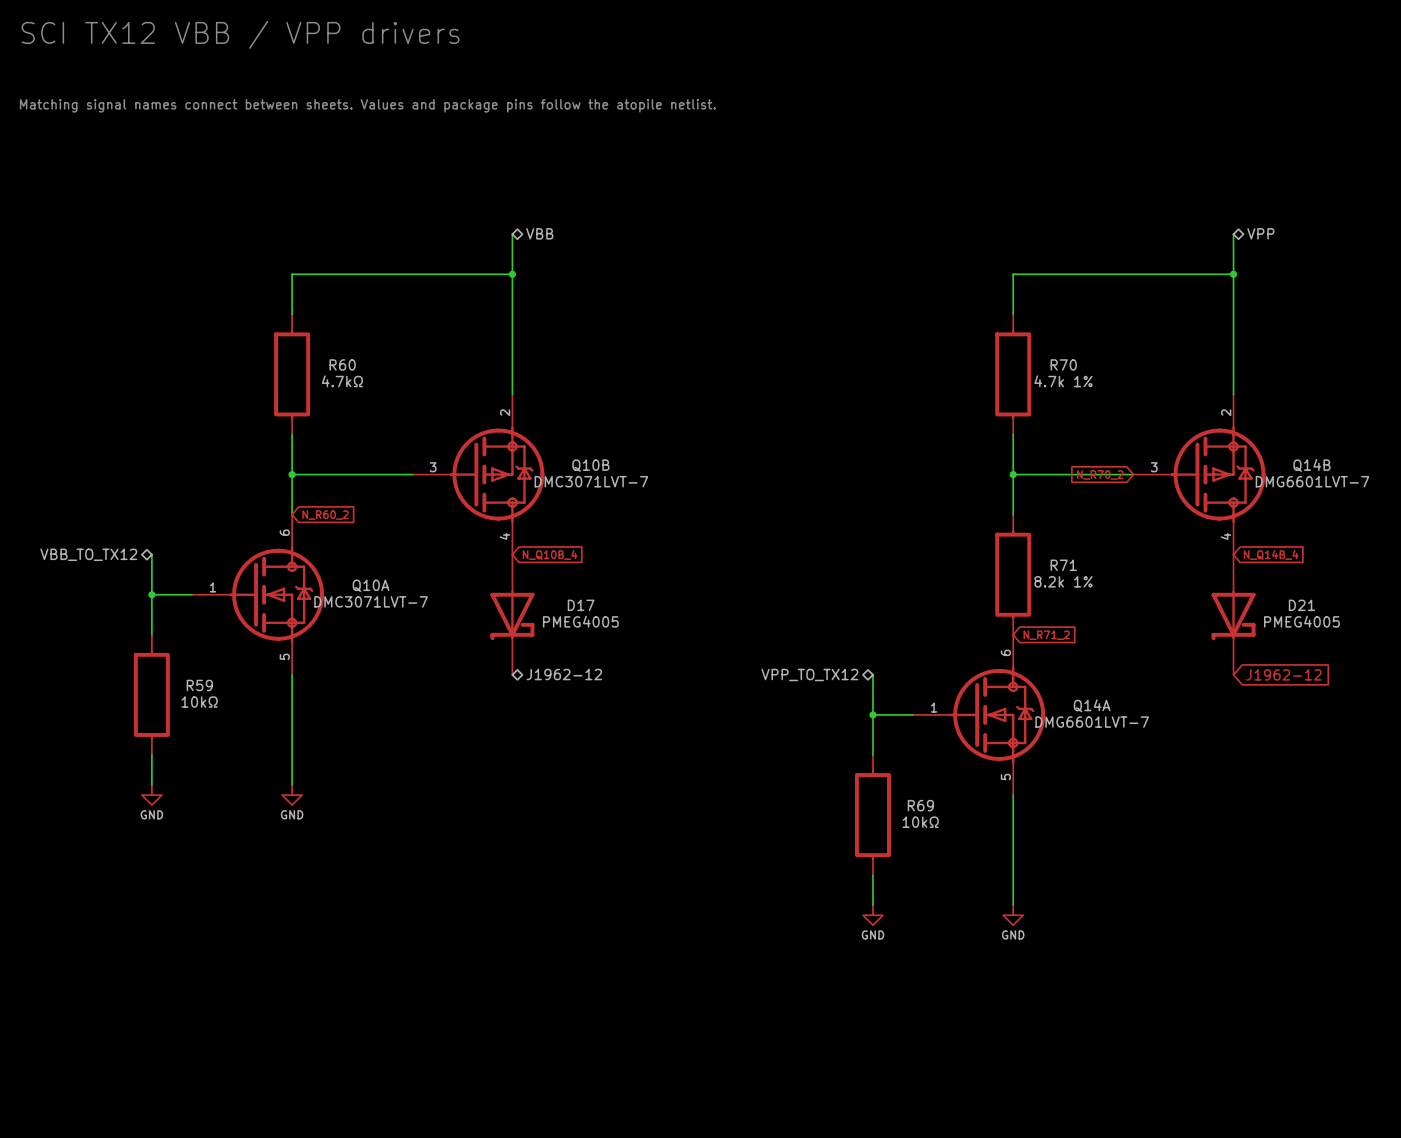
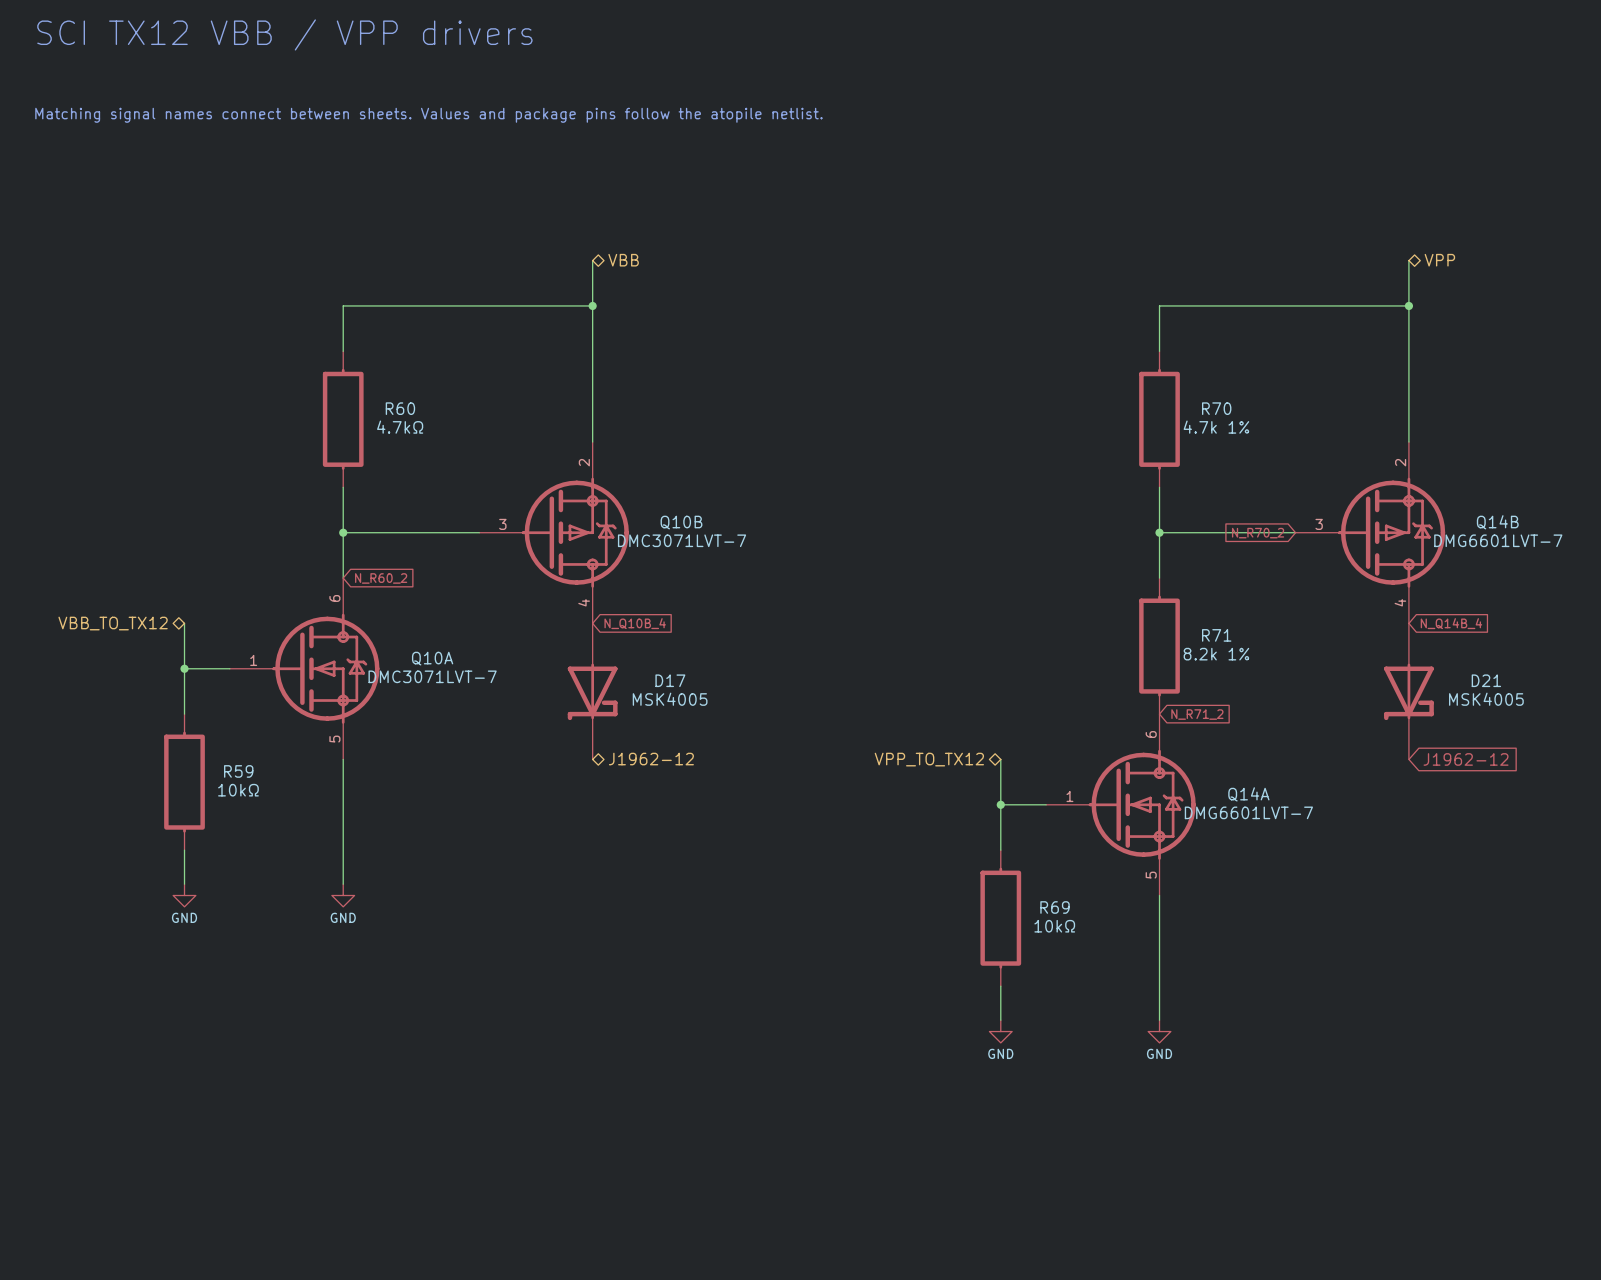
D17 value: PMEG4005 (580, 621) -> MSK4005 (670, 699)
D21 value: PMEG4005 (1301, 621) -> MSK4005 (1486, 699)

